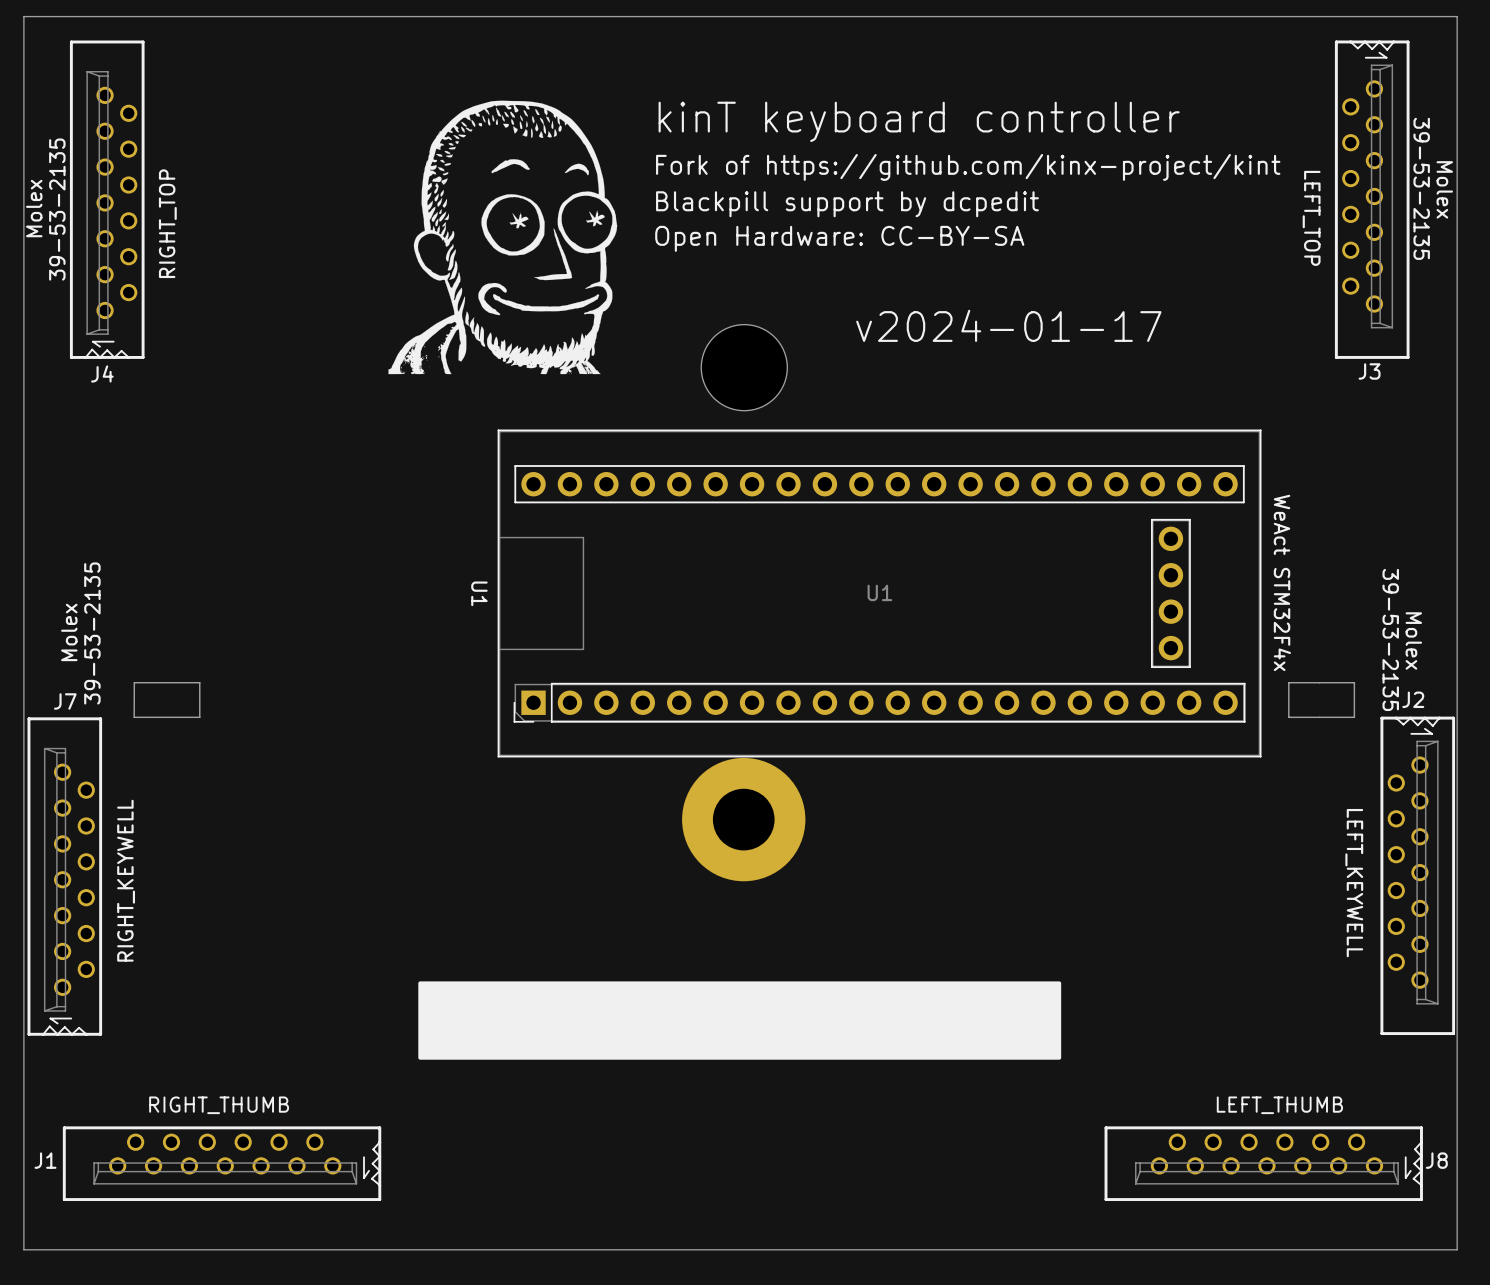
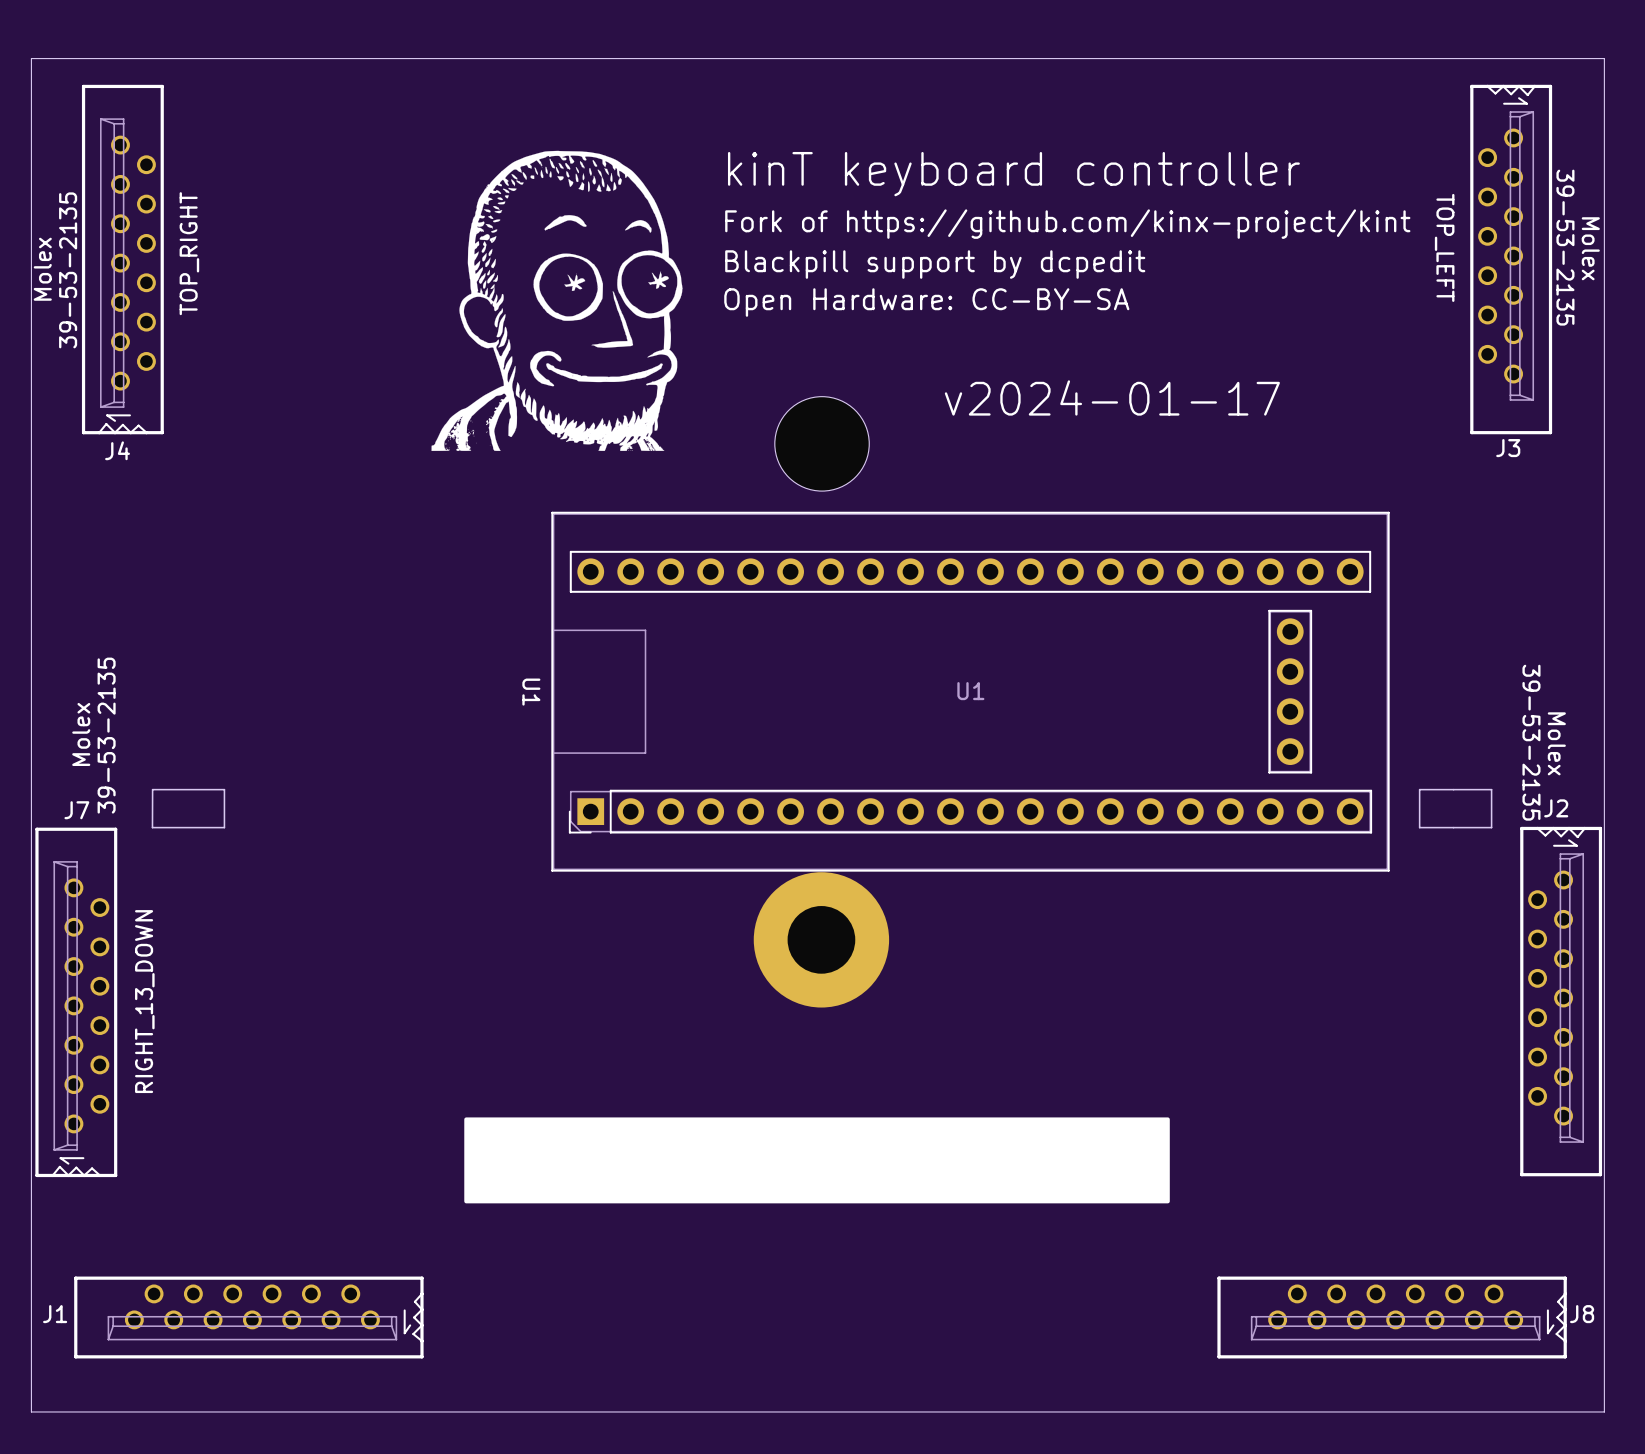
J3 value: LEFT_TOP (1311, 218) -> TOP_LEFT (1444, 247)
J4 value: RIGHT_TOP (167, 223) -> TOP_RIGHT (189, 253)
text: WeAct STM32F4x (1282, 582) -> none
J7 value: RIGHT_KEYWELL (126, 880) -> RIGHT_13_DOWN (144, 1001)
J2 value: LEFT_KEYWELL (1354, 883) -> none
J1 value: RIGHT_THUMB (219, 1105) -> none
J8 value: LEFT_THUMB (1279, 1105) -> none

